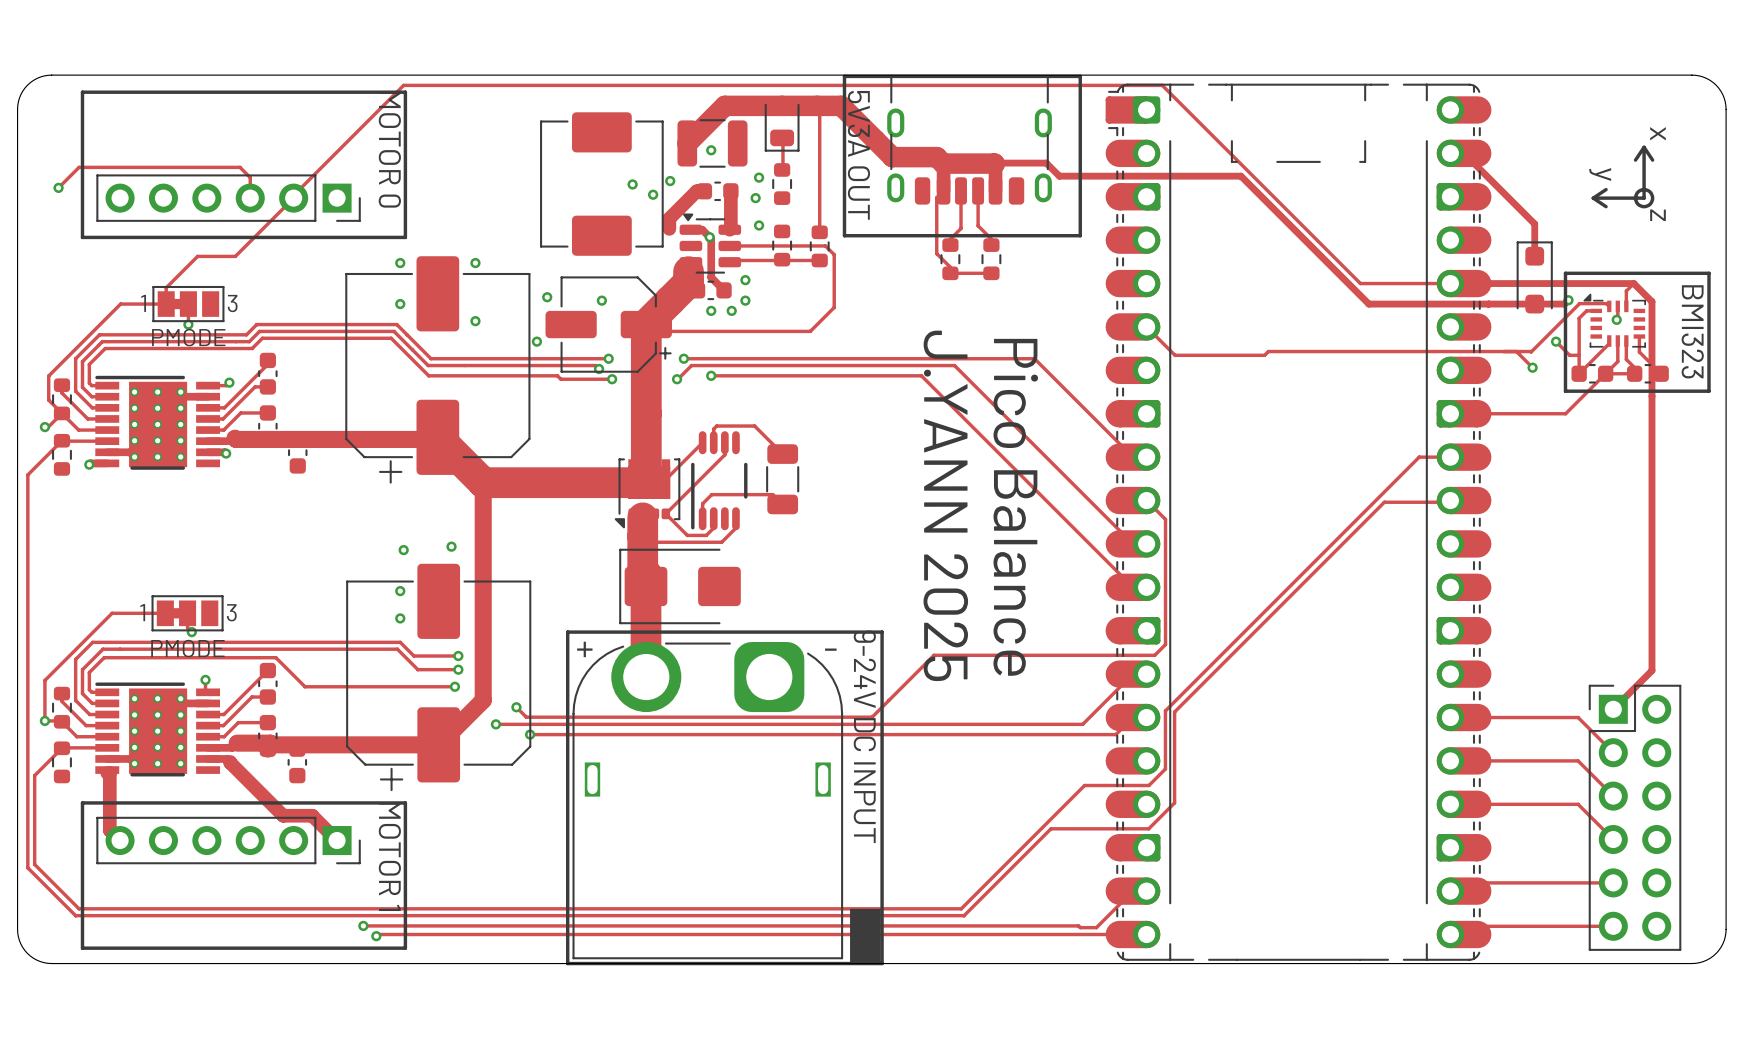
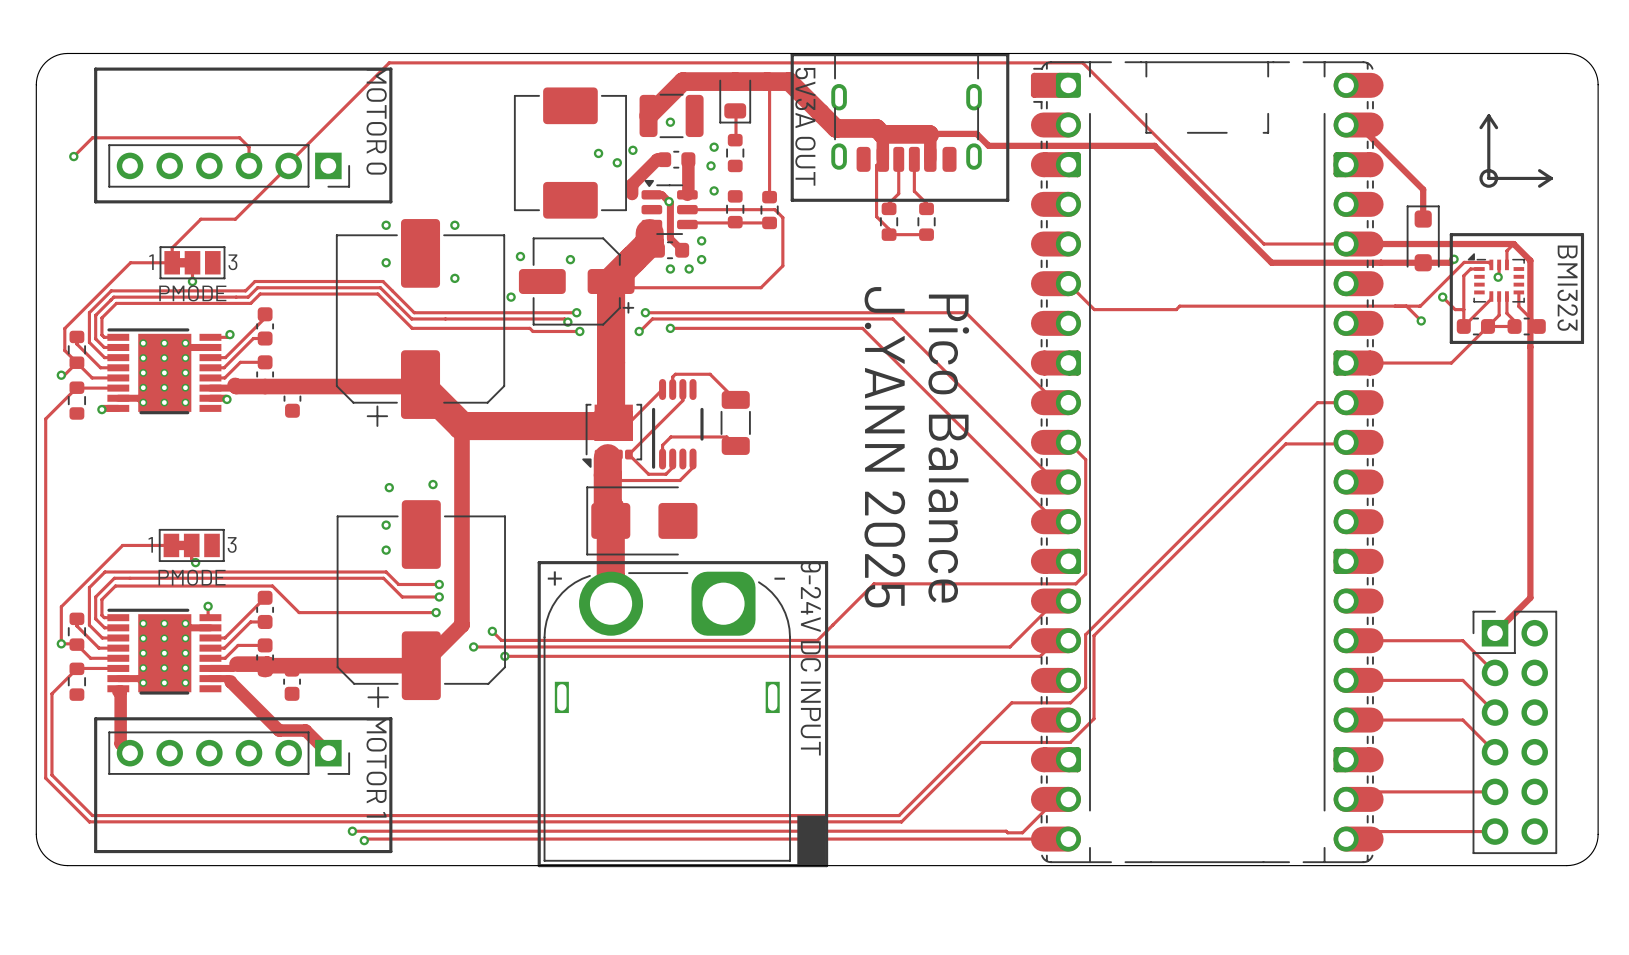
text: x (1657, 133) -> none
line: none -> (1488, 115) (1496, 127)
line: none -> (1488, 115) (1480, 127)
line: none -> (1488, 115) (1488, 178) (1551, 178)
line: (1644, 150) (1644, 198) (1596, 198) -> none
line: (1635, 160) (1644, 147) (1652, 160) -> none
text: y (1600, 174) -> none
line: (1606, 189) (1593, 198) (1606, 206) -> none
drawing position: (1644, 198) -> (1488, 178)
line: none -> (1539, 170) (1551, 178)
line: none -> (1551, 178) (1539, 186)
text: z (1657, 215) -> none

